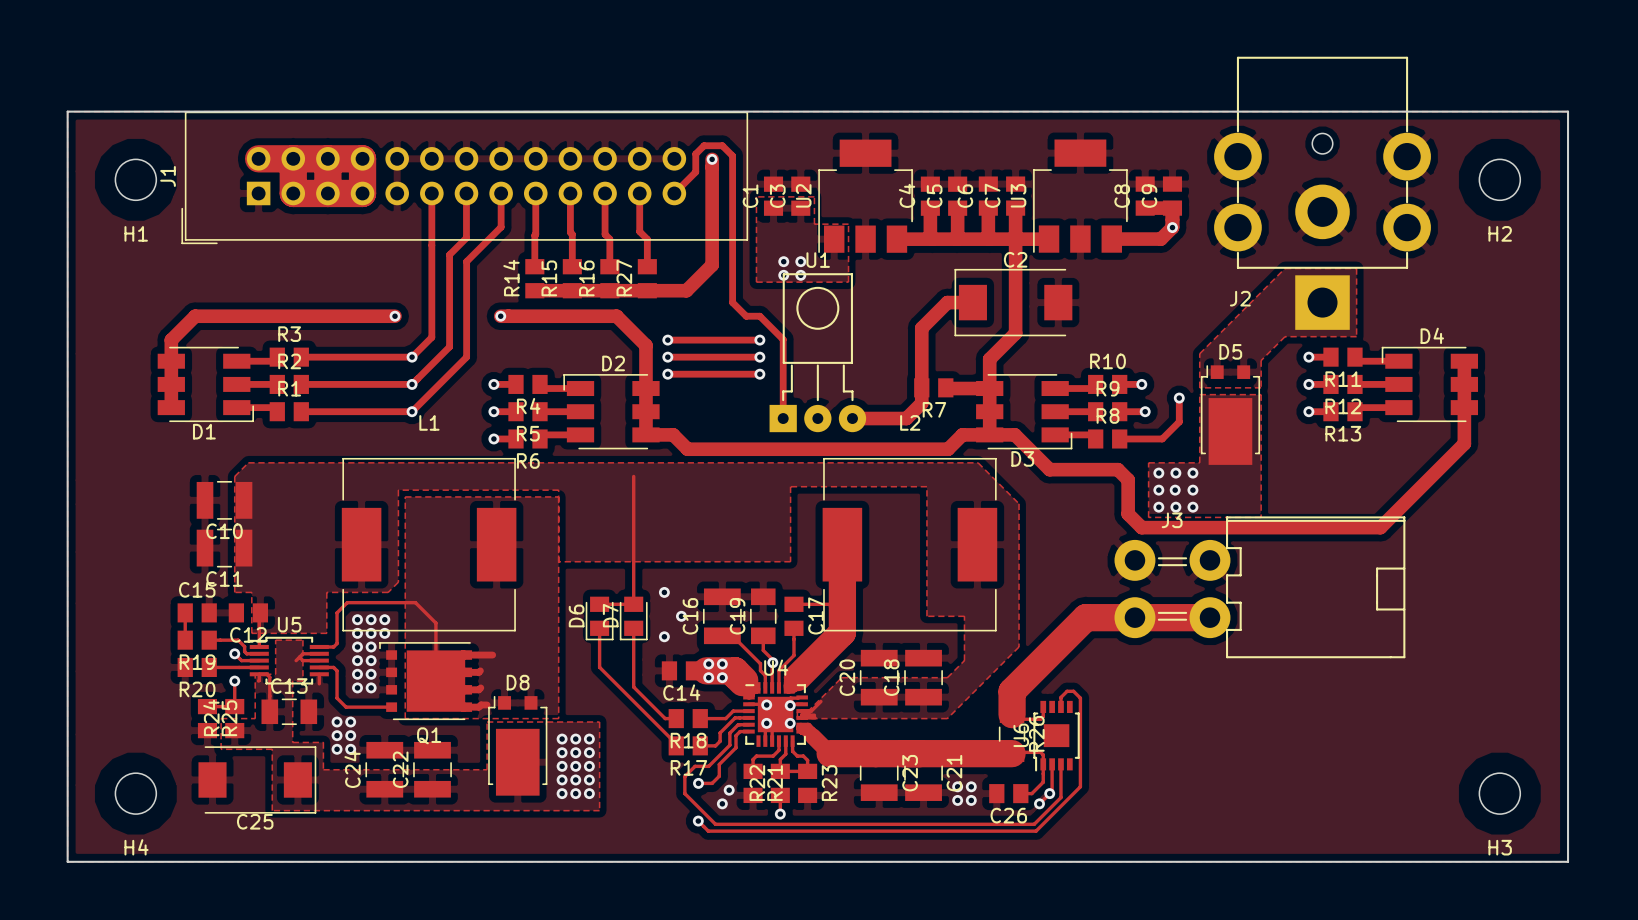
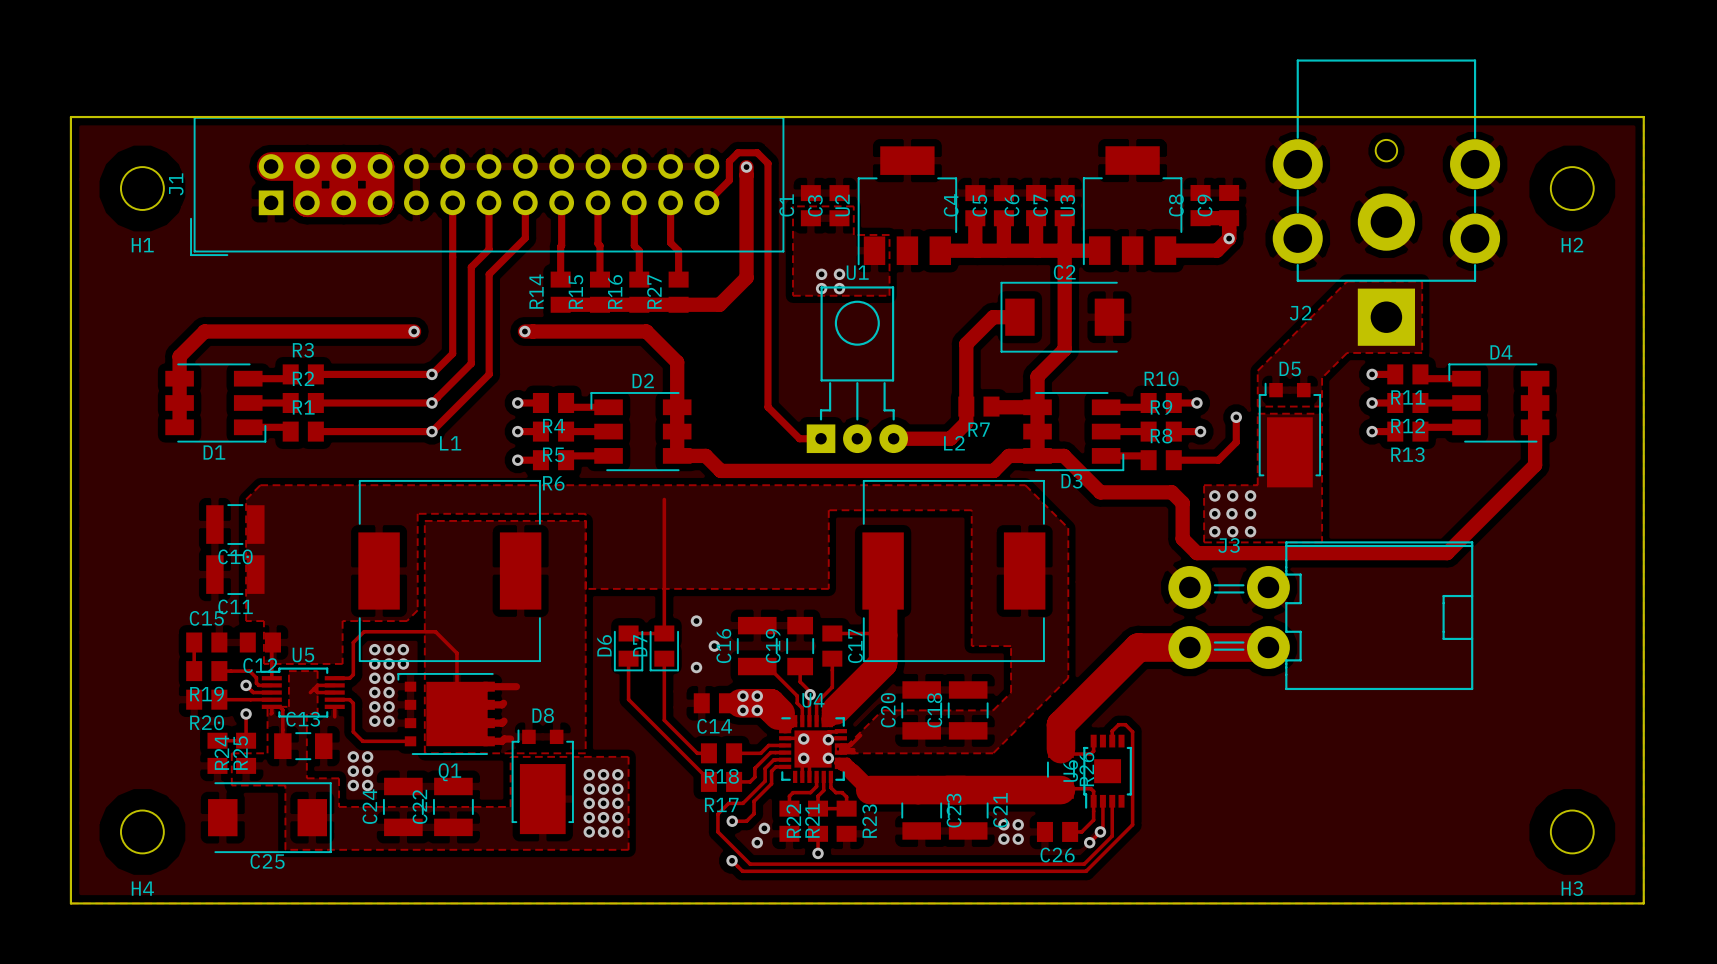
track: (732, 302) (746, 316) (759, 316) (783, 339) (783, 418) -> (767, 317) (767, 407) (799, 438) (821, 438)
track: (667, 340) (759, 340) -> none
via: (667, 340) -> none
via: (759, 340) -> none
track: (667, 357) (759, 357) -> none
via: (667, 357) -> none
via: (759, 357) -> none
track: (667, 374) (759, 374) -> none
via: (667, 374) -> none
via: (759, 374) -> none

